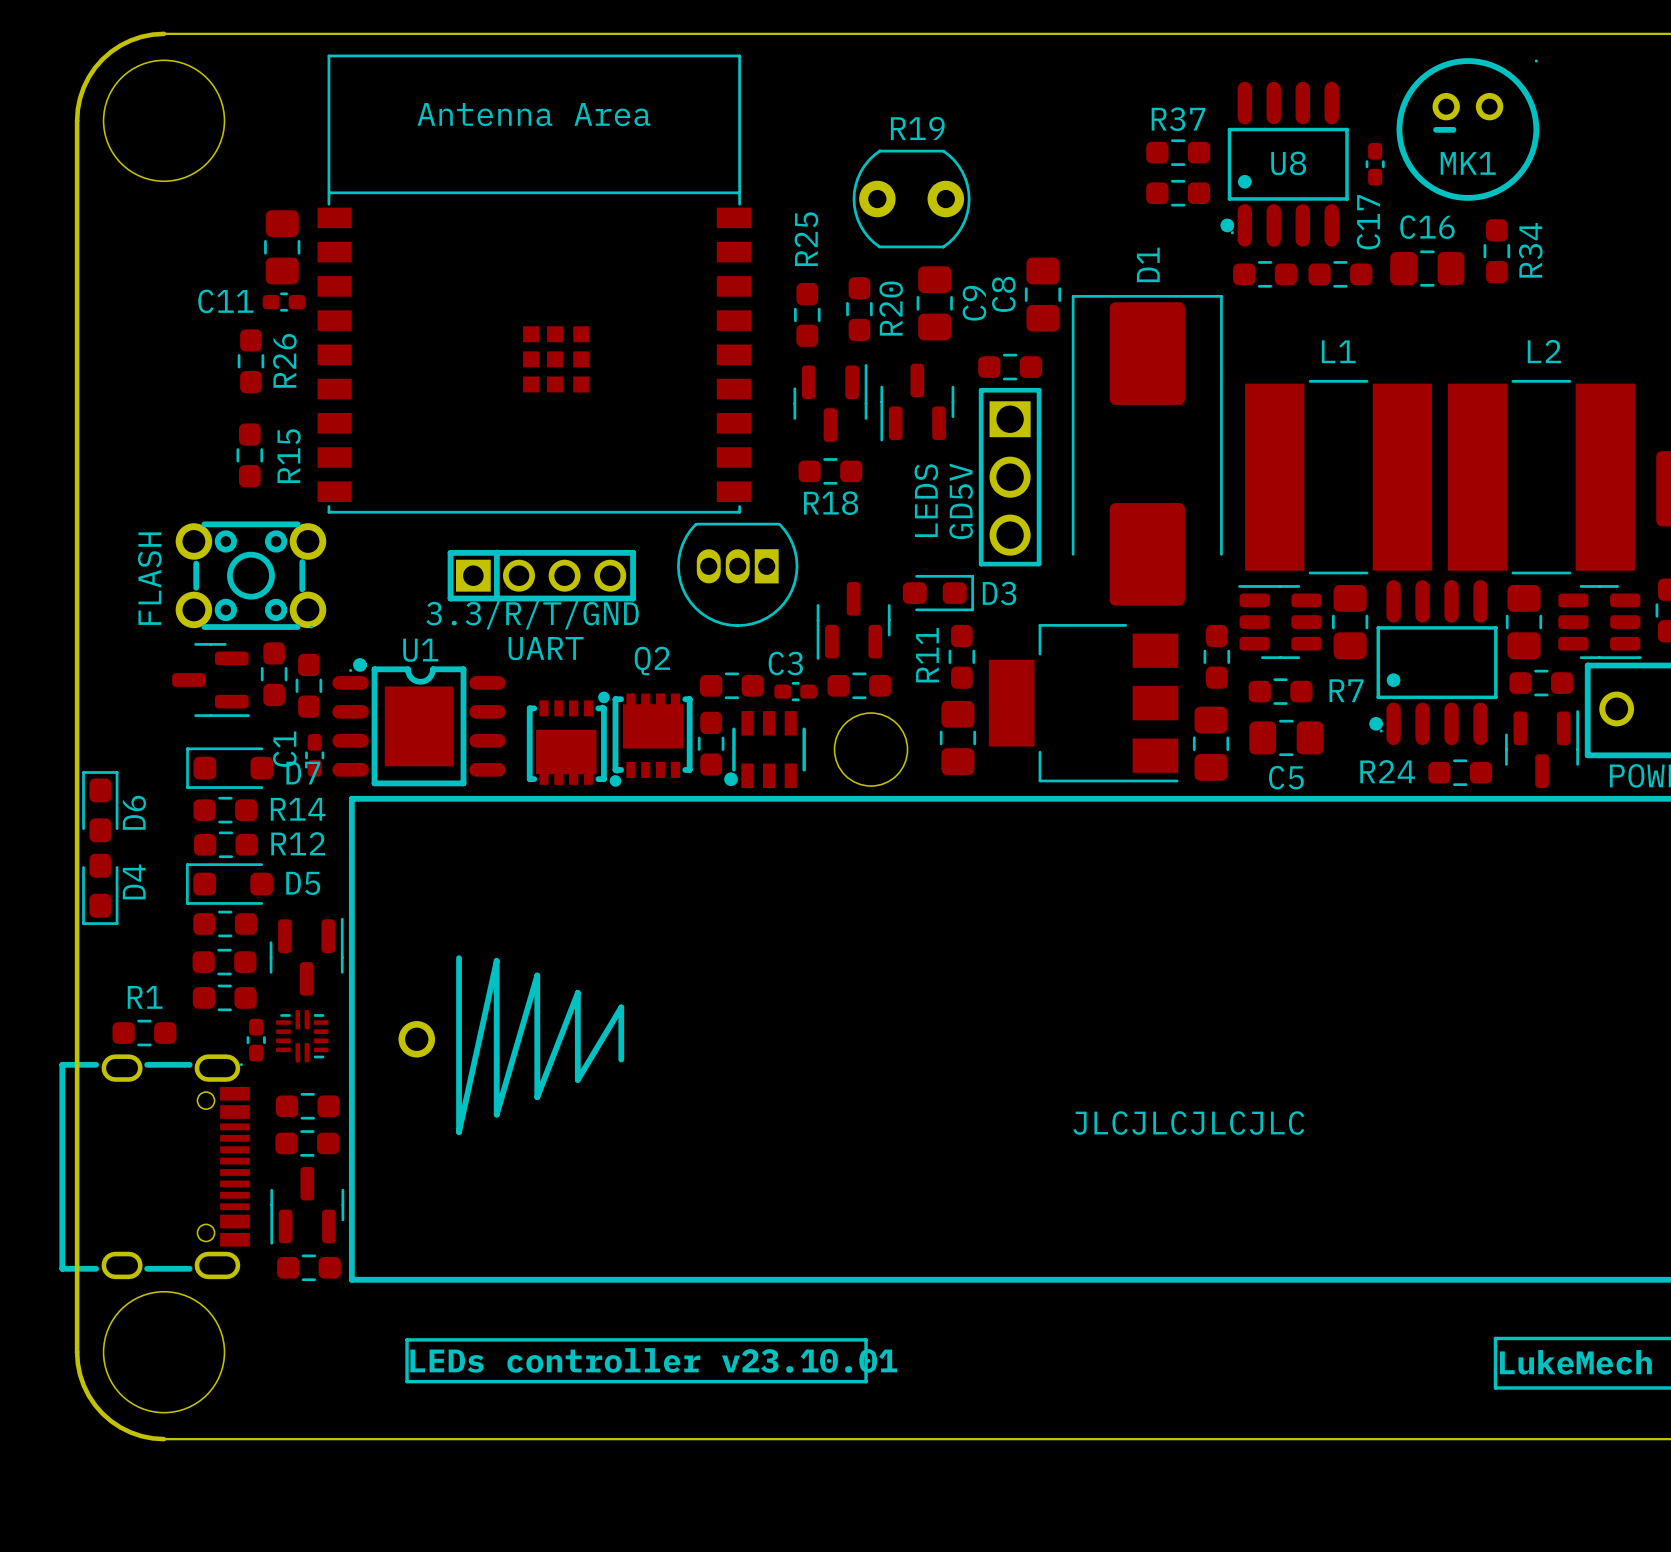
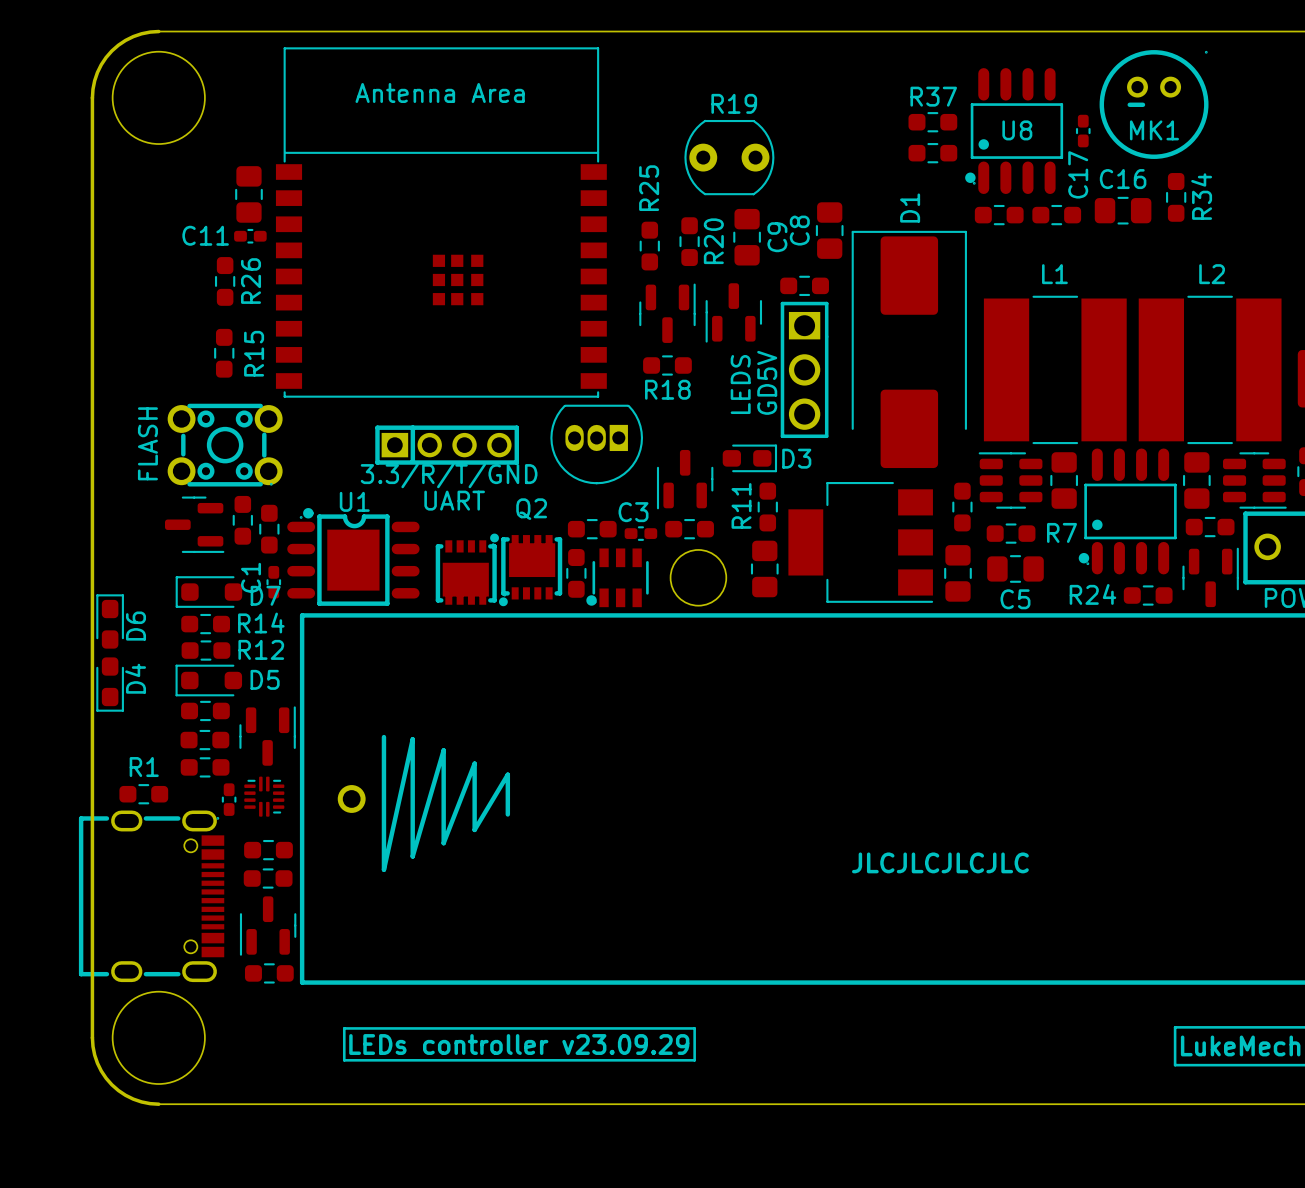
text: LEDs controller v23.10.01 (653, 1360) -> LEDs controller v23.09.29 (519, 1044)

